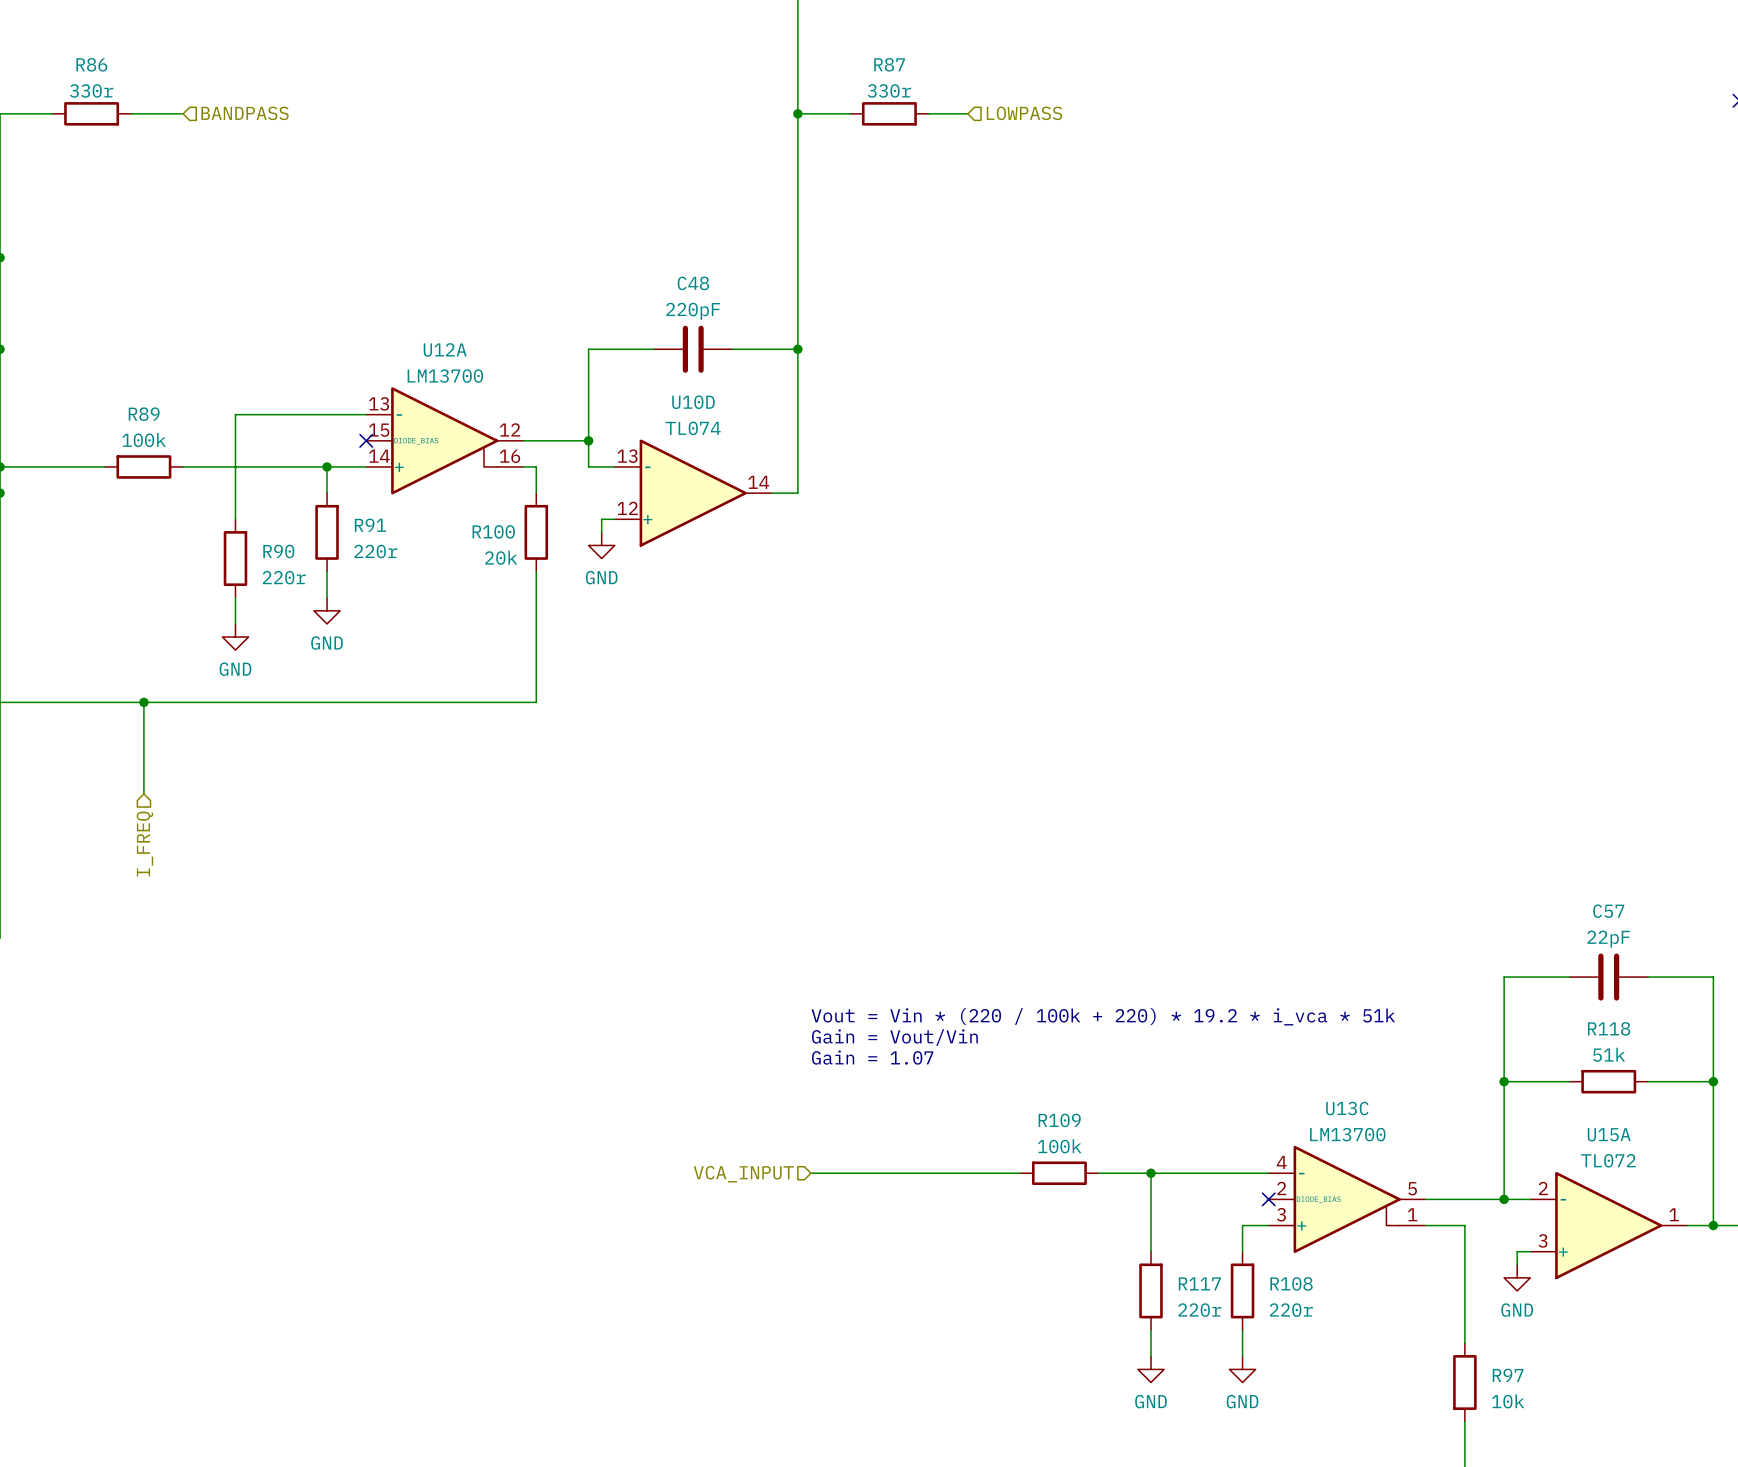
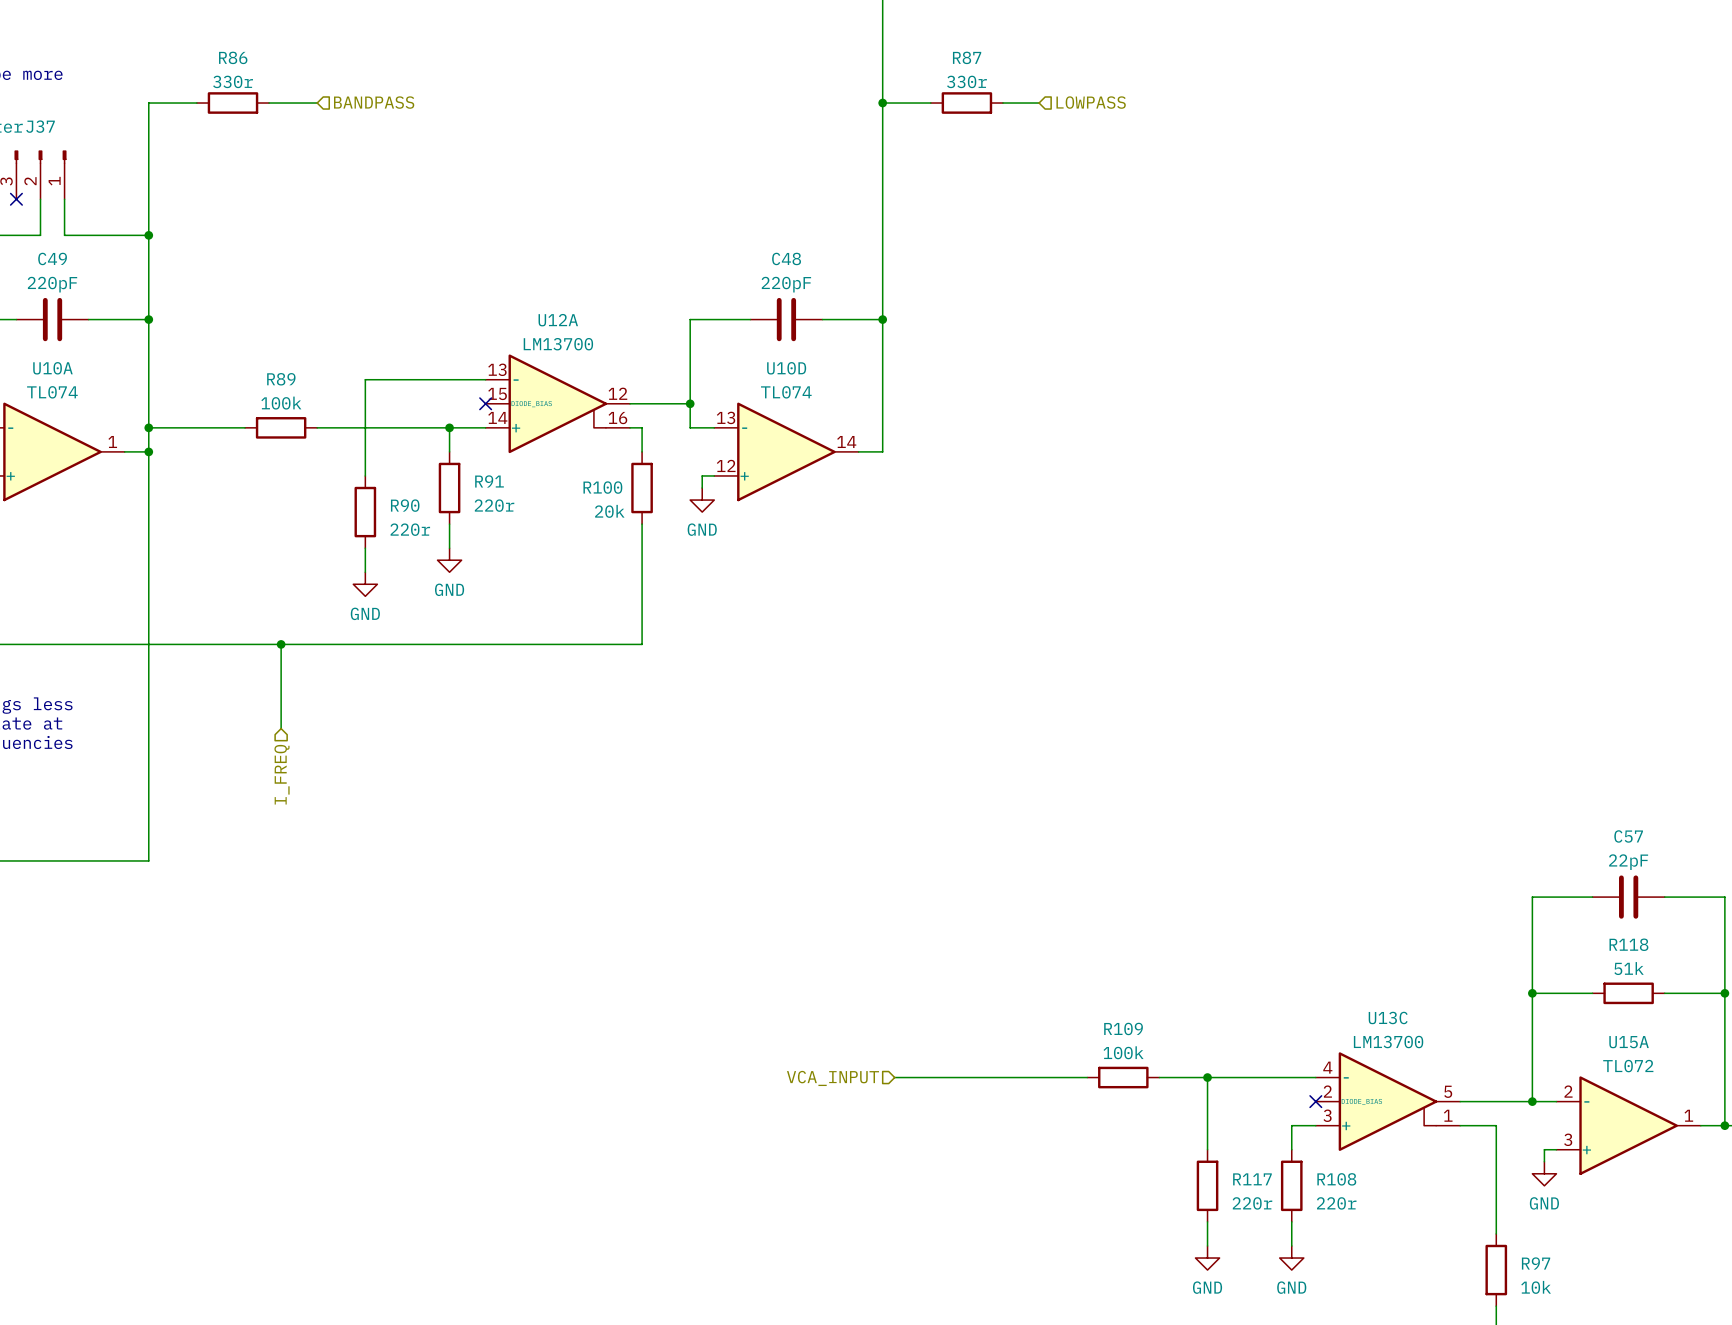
text: Vout = Vin * (220 / 100k + 220) * 19.2 * i_vca * 51k (1103, 1016) -> none
text: Gain = Vout/Vin (894, 1037) -> none
text: Gain = 1.07 (872, 1057) -> none

